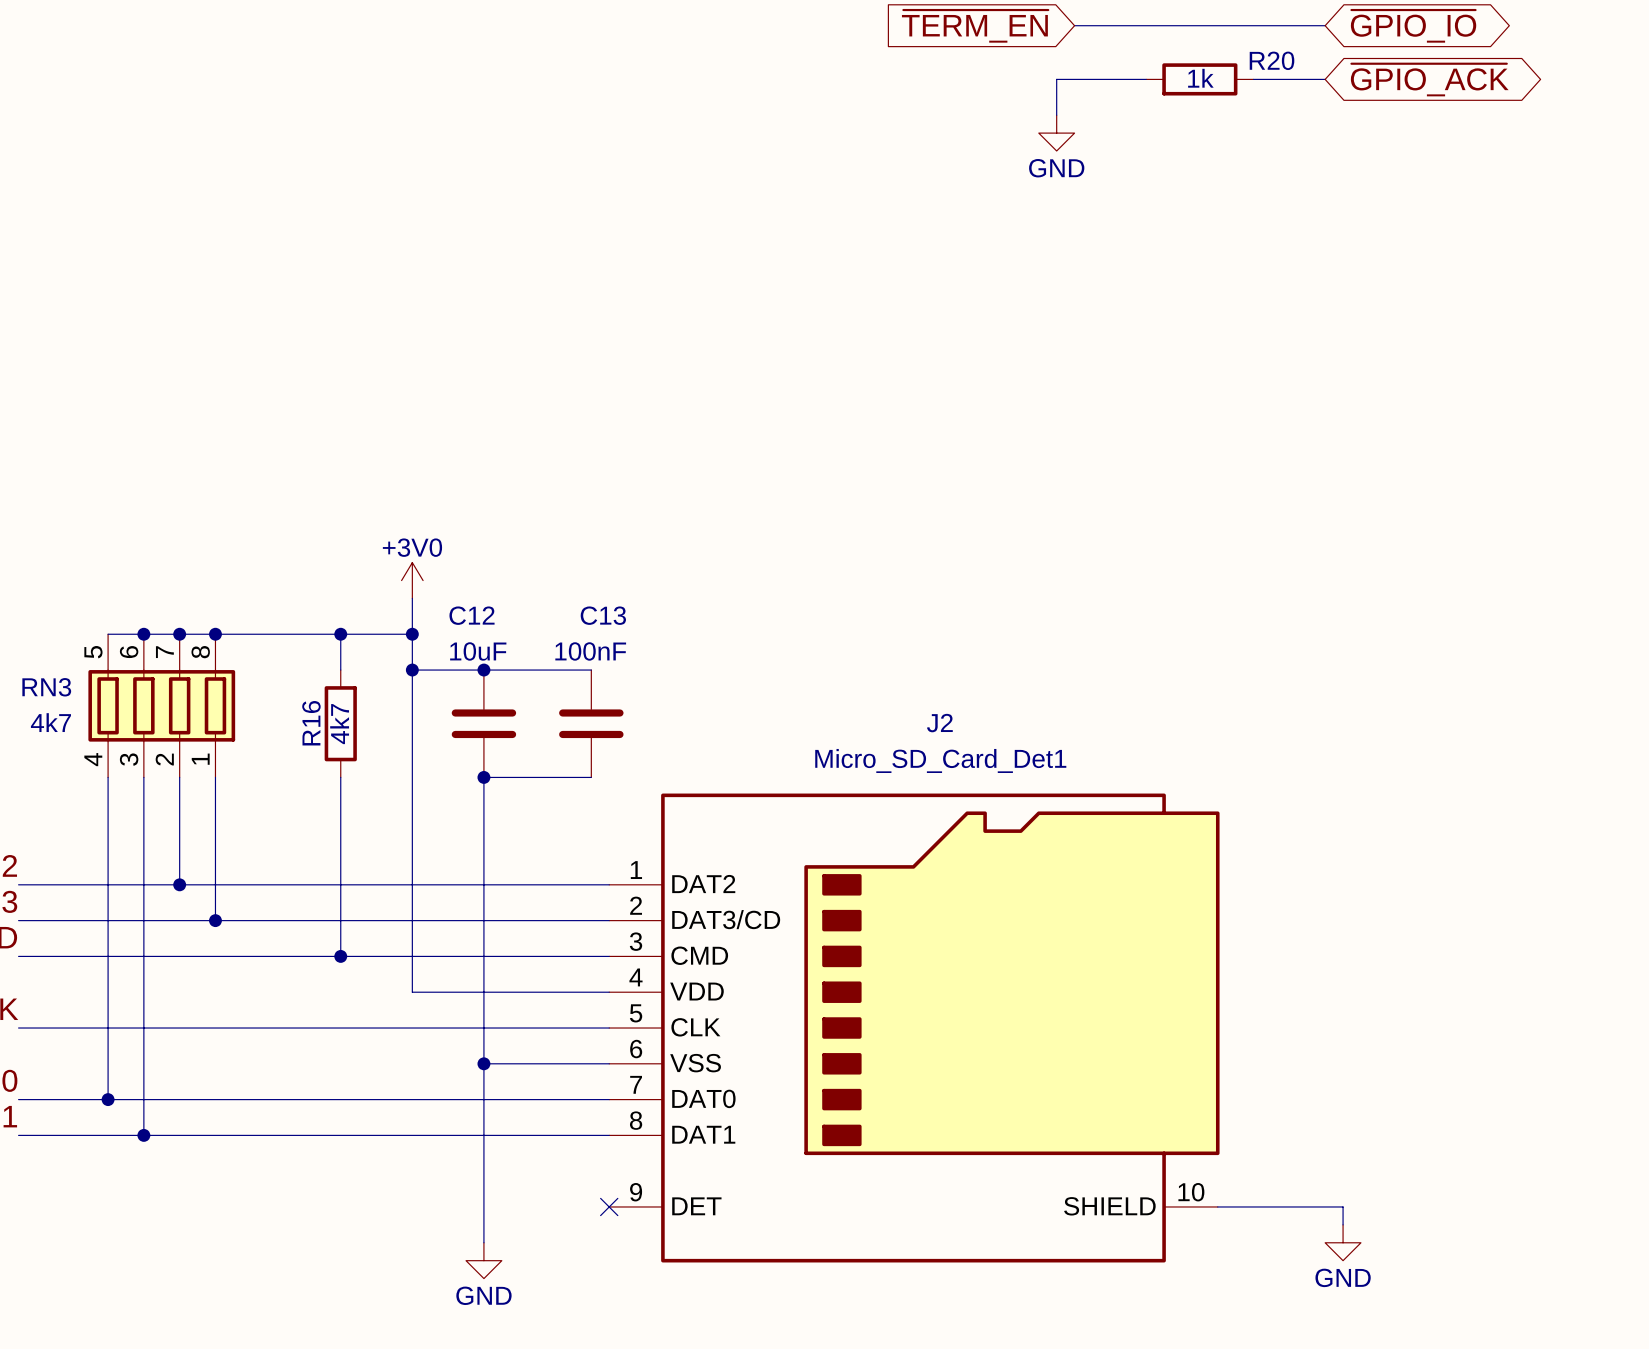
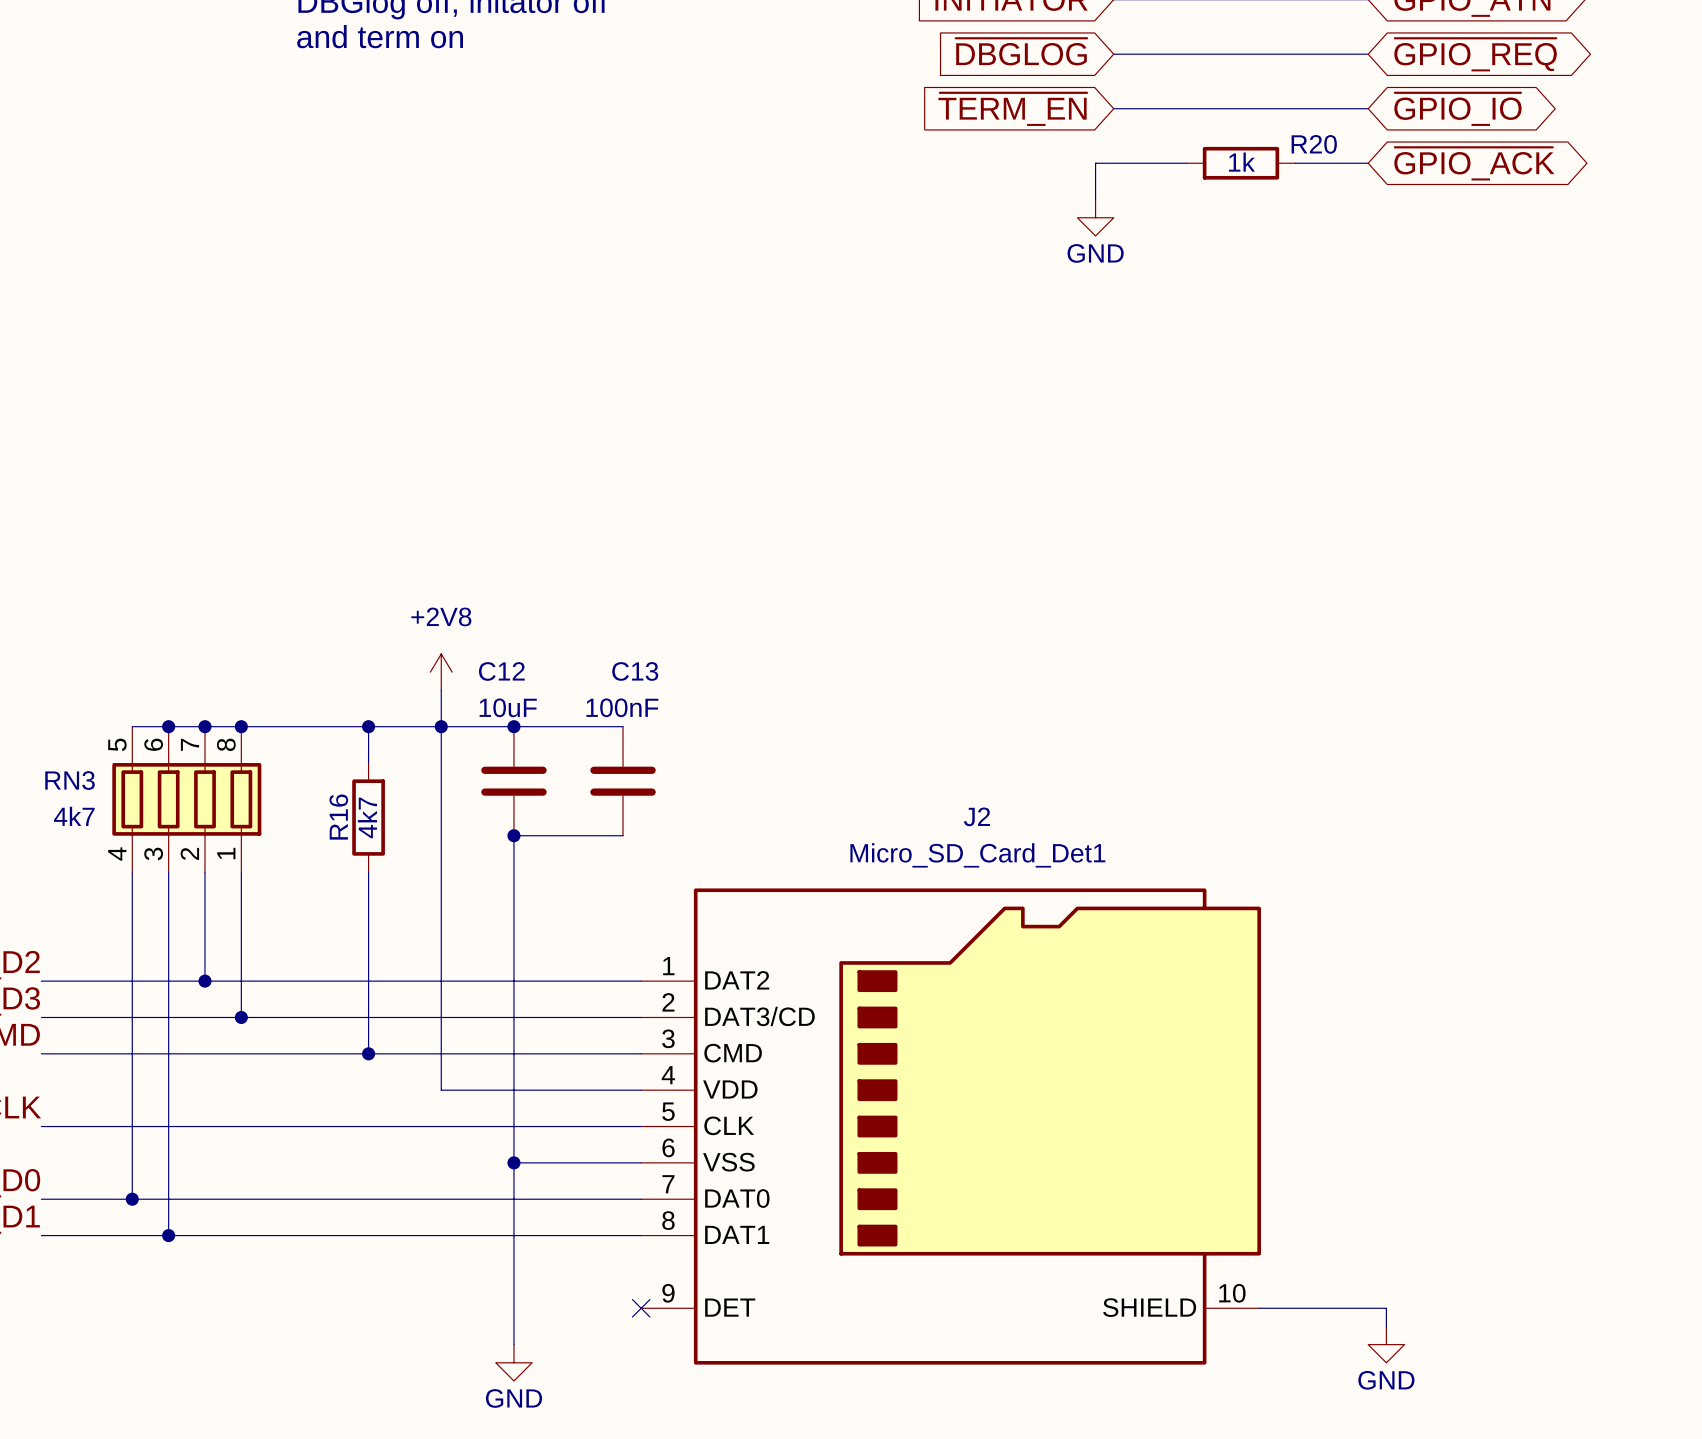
power symbol: +3V0 (412, 580) -> +2V8 (441, 672)
junction: none -> (513, 726)
wire: (412, 670) (591, 670) -> (441, 726) (623, 726)
junction: (412, 670) -> none
junction: (483, 670) -> none
C12 position: (483, 723) -> (513, 781)
C13 position: (591, 723) -> (623, 781)
junction: none -> (513, 835)
wire: (483, 777) (591, 777) -> (513, 872) (513, 835) (623, 835)
junction: (483, 777) -> none

